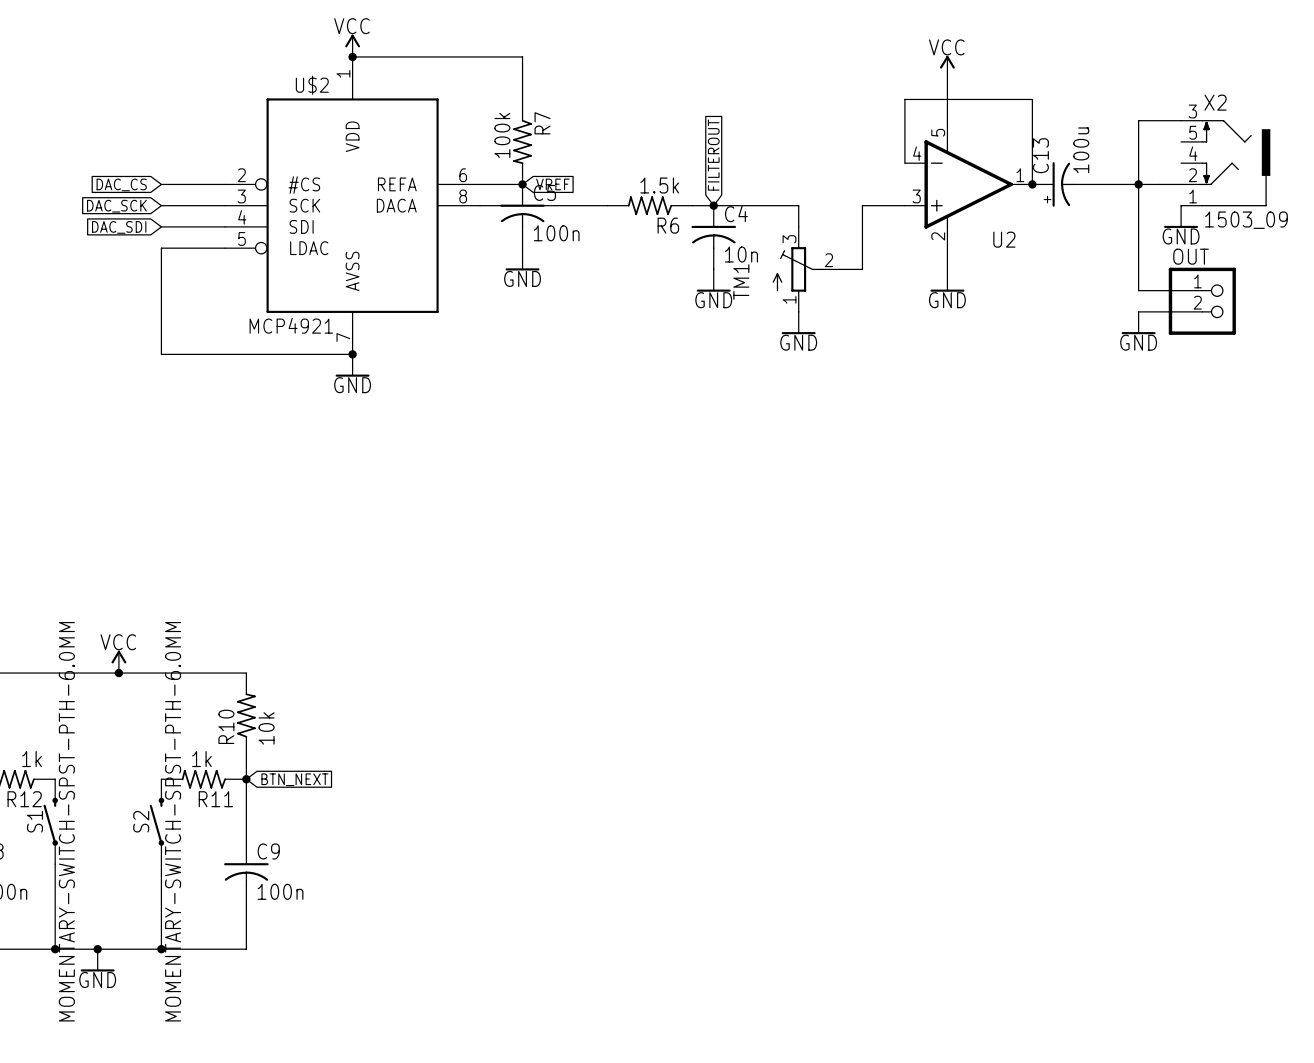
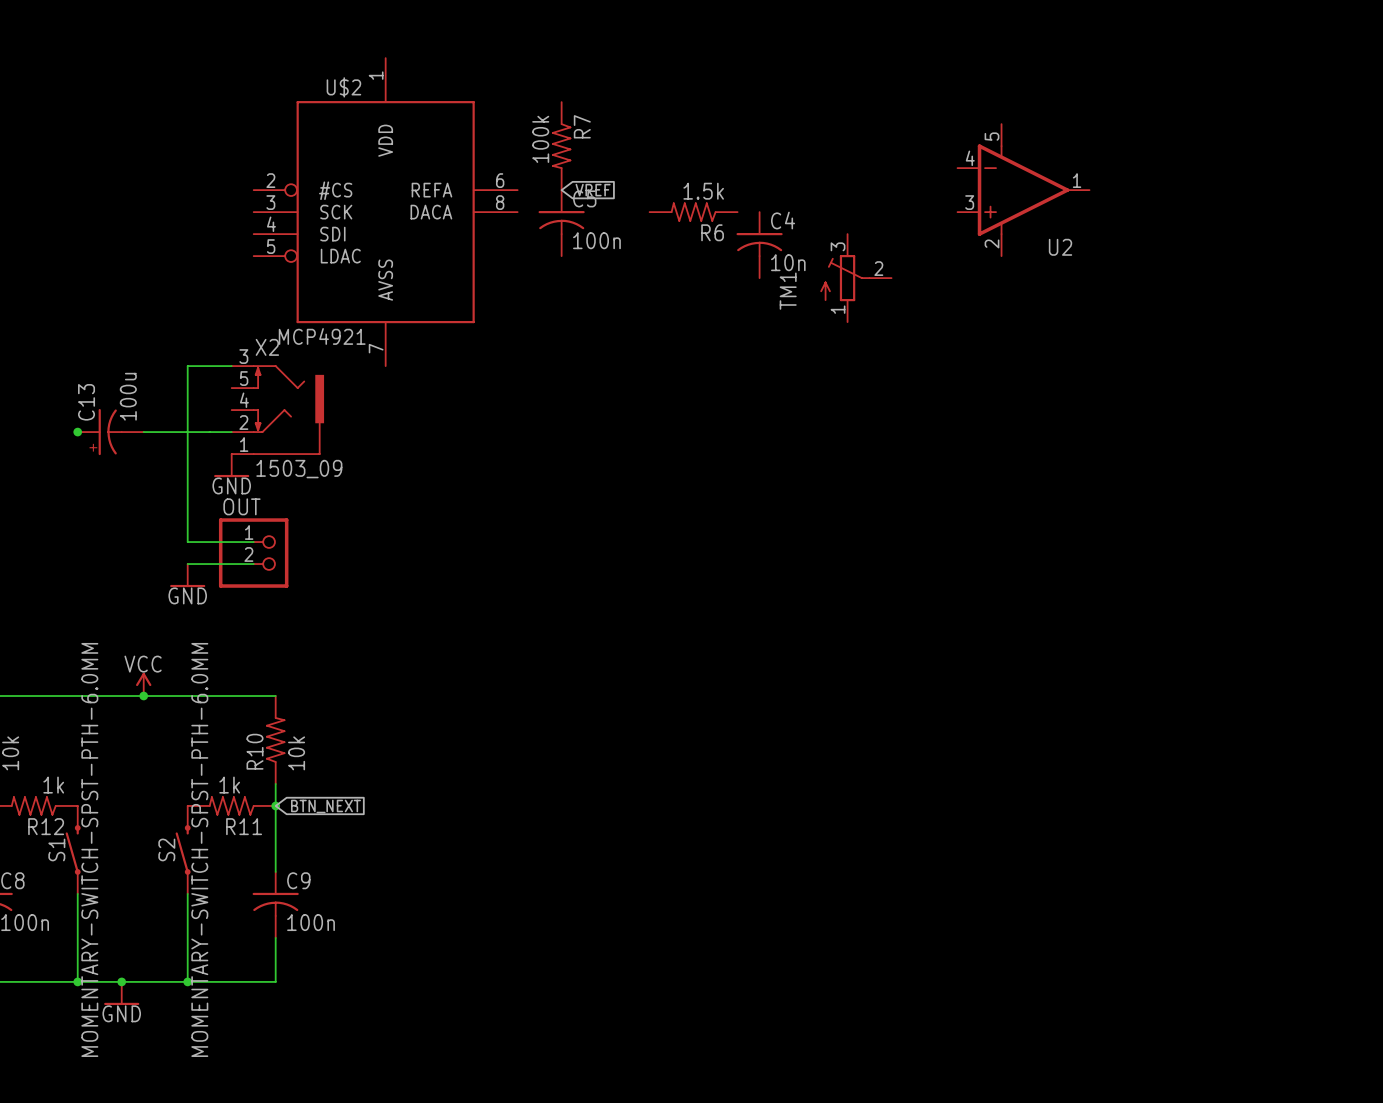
power symbol: VCC (352, 45) -> none
wire: (352, 56) (522, 56) (522, 99) -> none
junction: (352, 56) -> none
power symbol: VCC (947, 67) -> none
wire: (947, 78) (947, 120) -> none
wire: (1181, 120) (1138, 120) (1138, 290) (1202, 290) -> none
global label: FILTEROUT (713, 155) -> none
wire: (904, 163) (904, 99) (1032, 99) (1032, 184) -> none
X2 position: (1225, 163) -> (277, 410)
global label: DAC_CS (121, 184) -> none
wire: (161, 184) (225, 184) -> none
wire: (480, 184) (522, 184) -> none
junction: (522, 184) -> none
junction: (1032, 184) -> none
C13 position: (1064, 184) -> (110, 432)
wire: (1096, 184) (1181, 184) -> none
junction: (1138, 184) -> none
wire: (161, 205) (225, 205) -> none
wire: (480, 205) (607, 205) -> none
wire: (692, 205) (798, 205) (798, 226) -> none
junction: (713, 205) -> none
wire: (904, 205) (862, 205) (862, 269) (841, 269) -> none
global label: DAC_SCK (116, 206) -> none
power symbol: GND (1181, 216) -> none
wire: (161, 226) (225, 226) -> none
global label: DAC_SDI (119, 227) -> none
wire: (225, 248) (161, 248) (161, 354) -> (253, 542) (187, 542) (187, 366)
wire: (947, 248) (947, 269) -> none
power symbol: GND (522, 259) -> none
power symbol: GND (713, 280) -> none
power symbol: GND (947, 280) -> none
OUT: (1202, 301) -> none
wire: (1138, 311) (1202, 311) -> none
power symbol: GND (798, 323) -> none
power symbol: GND (1138, 323) -> none
wire: (203, 354) (352, 354) -> none
junction: (352, 354) -> none
power symbol: GND (352, 365) -> none
junction: none -> (77, 432)
wire: none -> (143, 432) (231, 432)
power symbol: none -> GND (231, 465)
OUT: none -> (253, 553)
wire: none -> (187, 564) (253, 564)
power symbol: none -> GND (187, 575)

